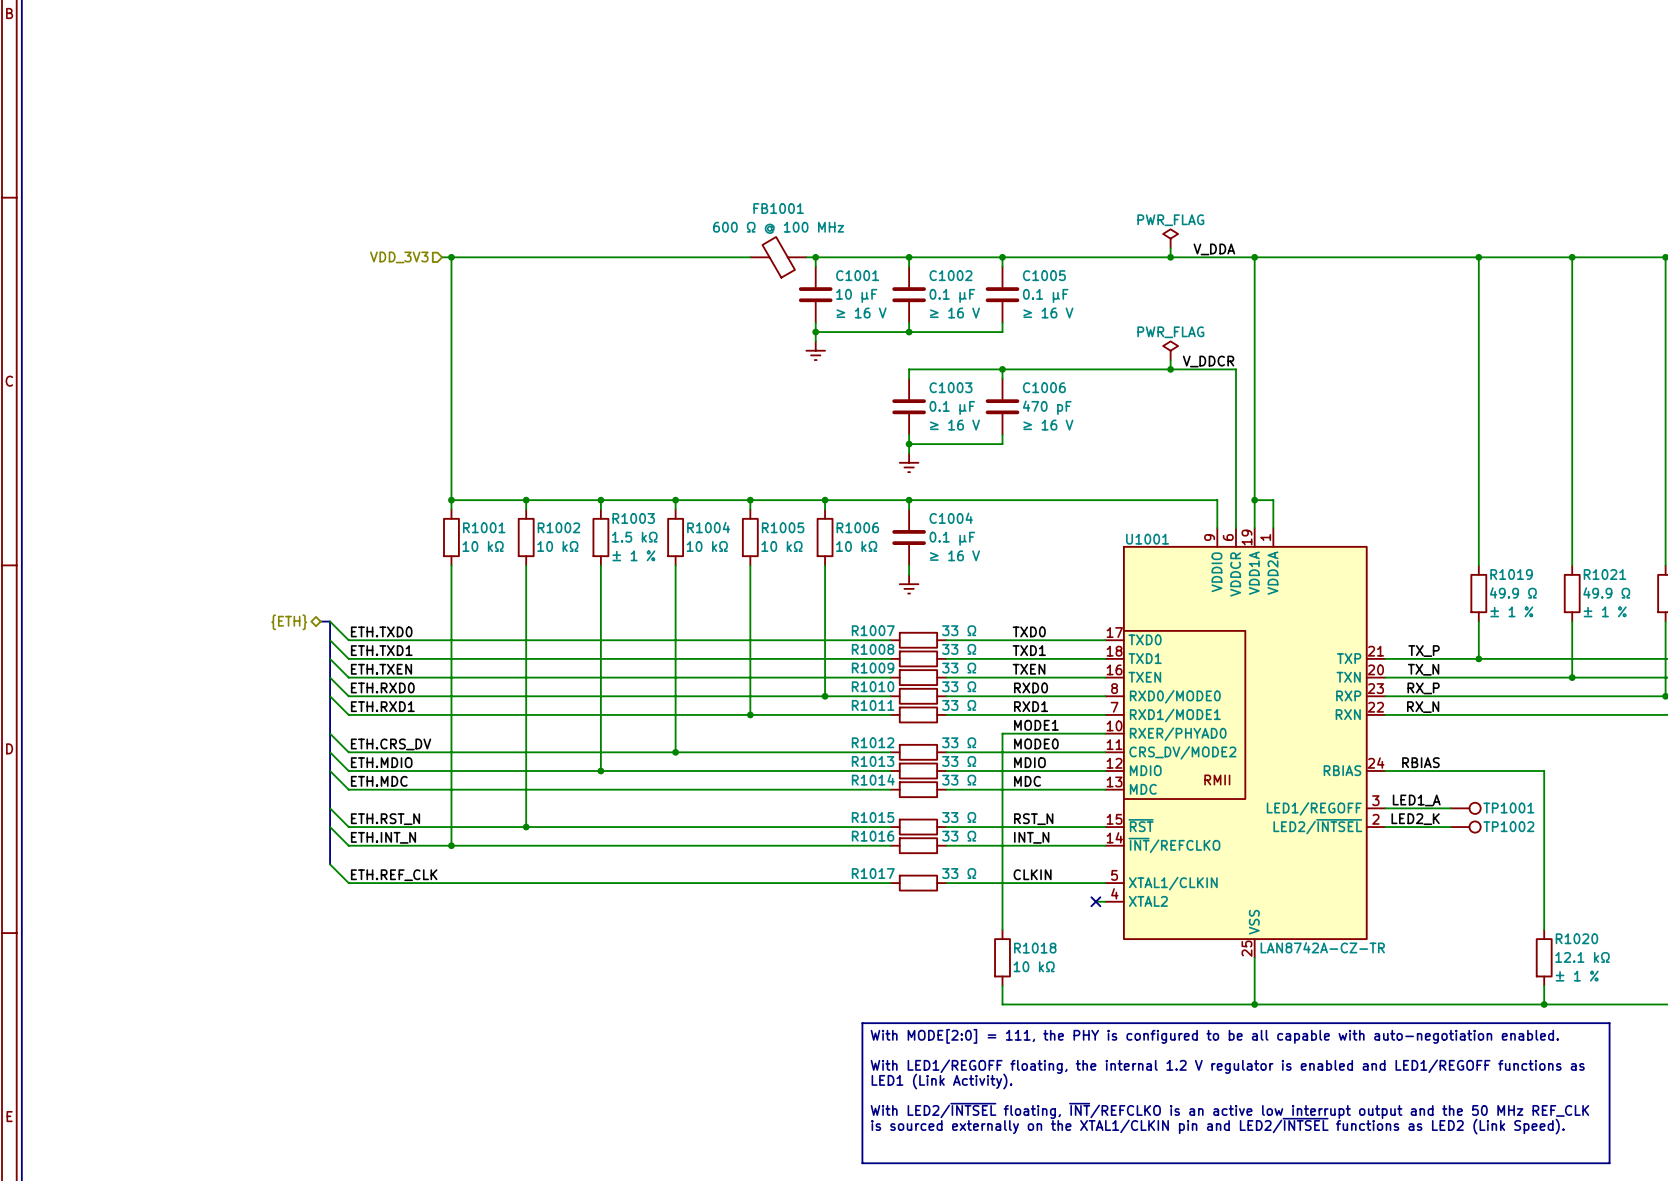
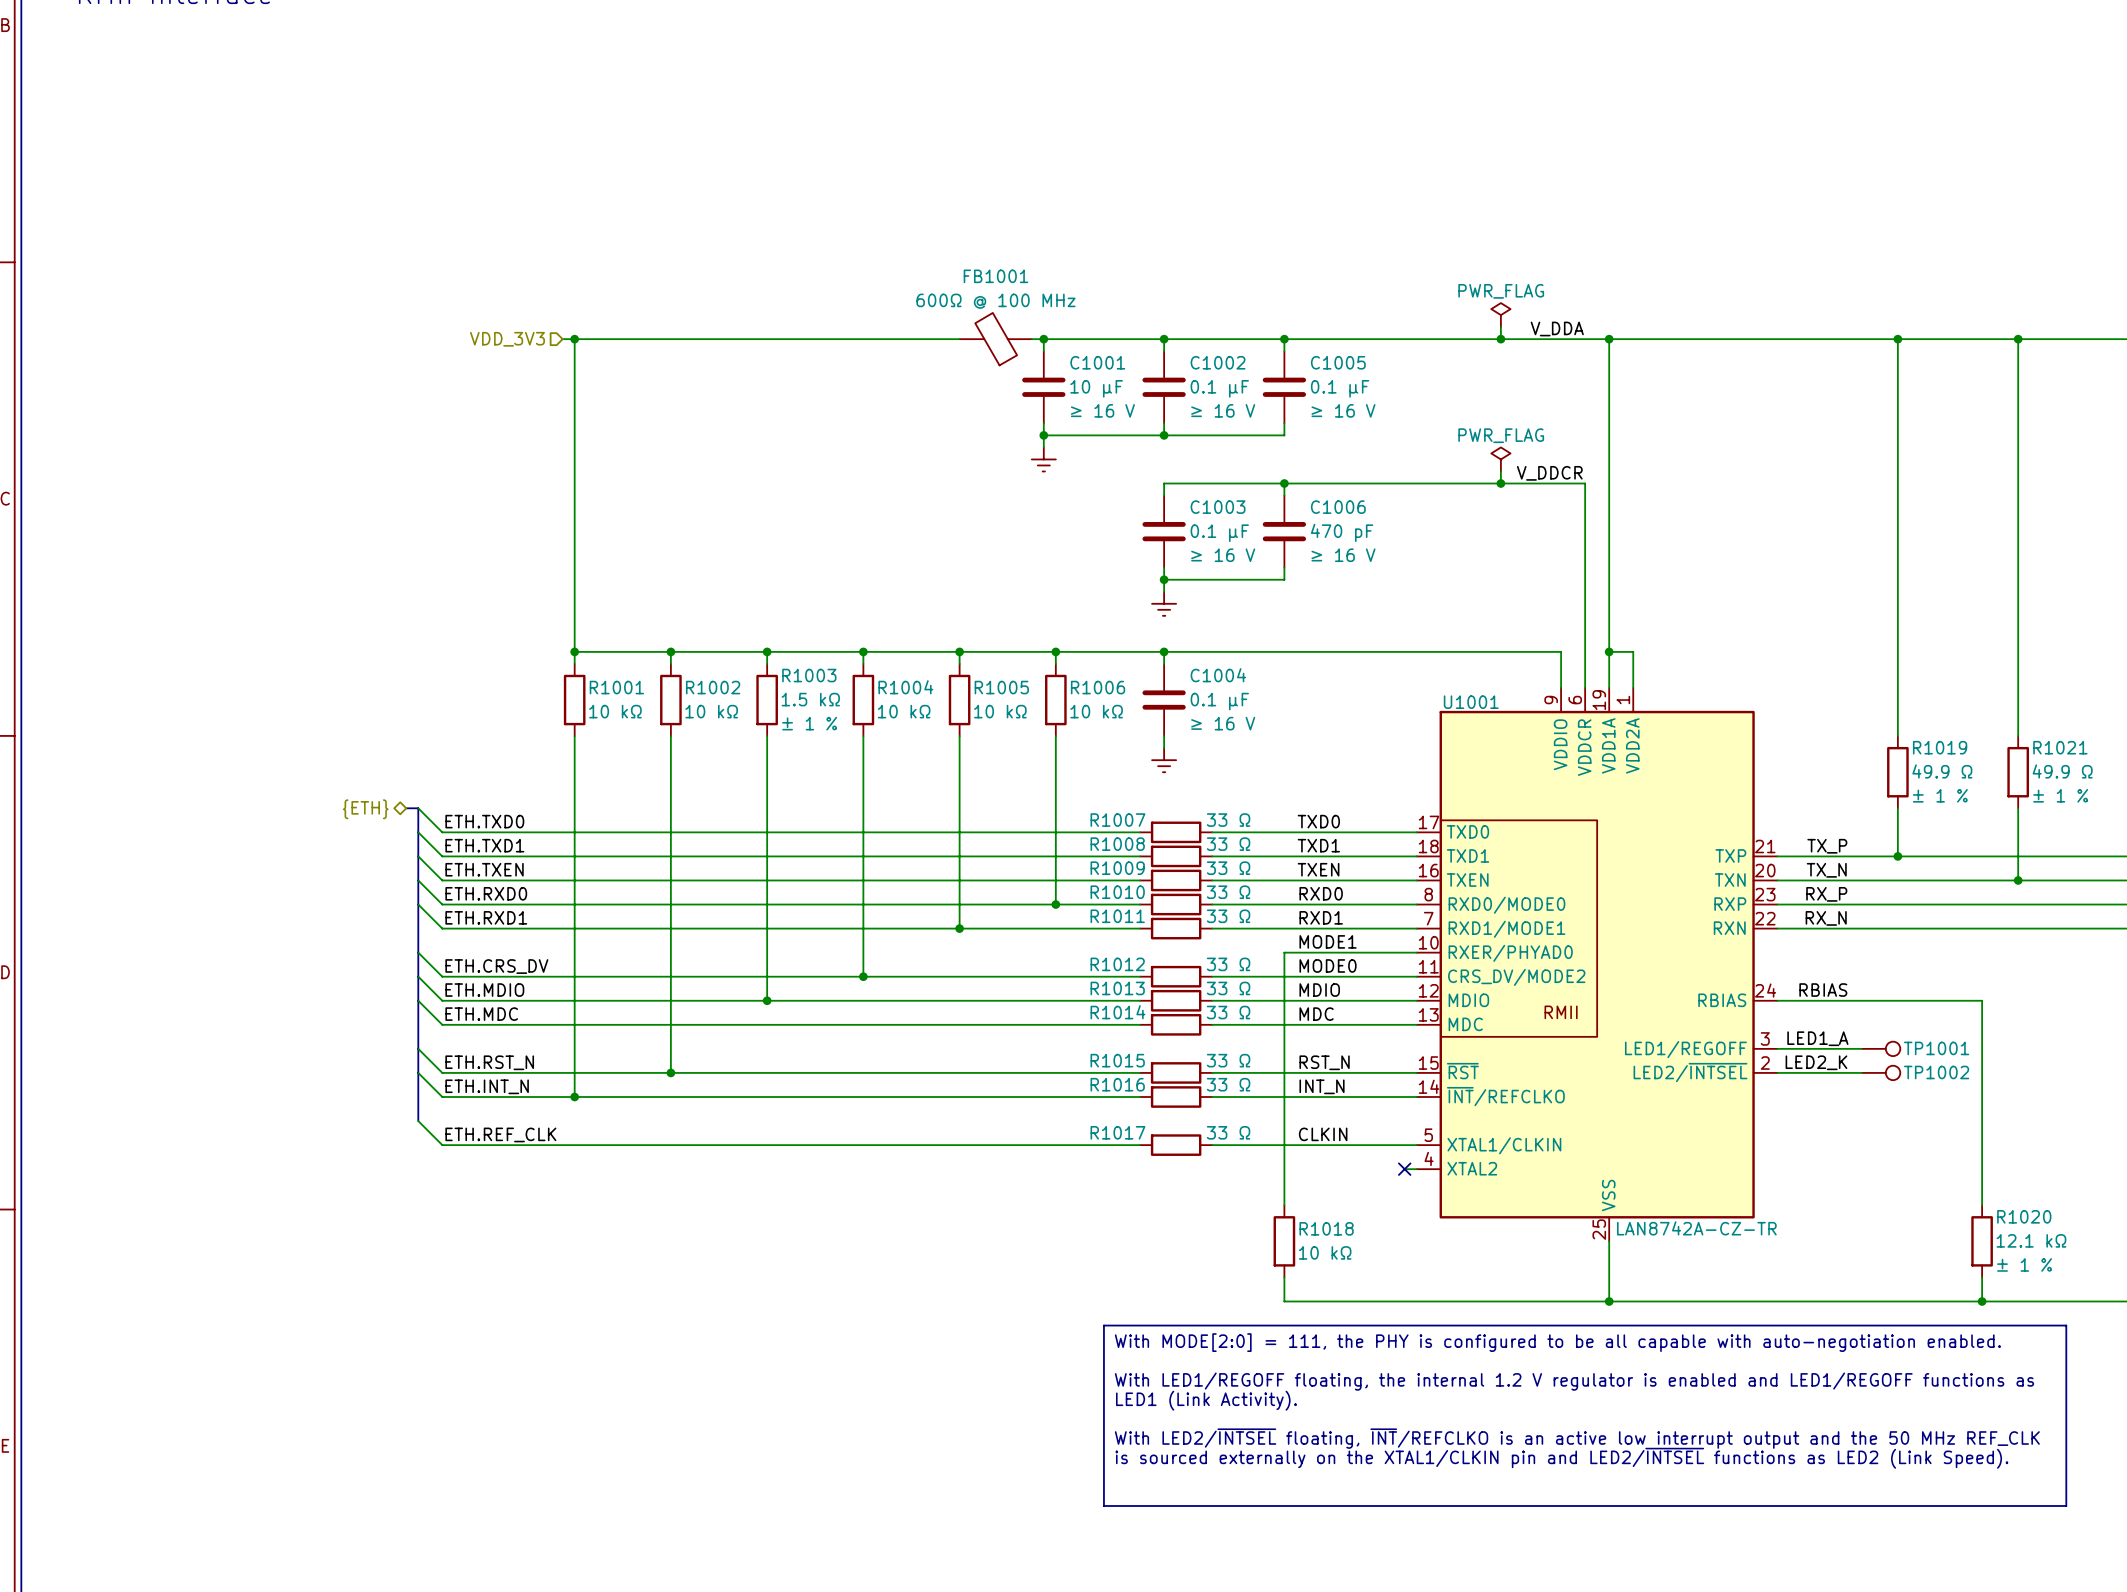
FB1001 value: 600 Ω @ 100 MHz (778, 227) -> 600Ω @ 100 MHz (995, 301)

